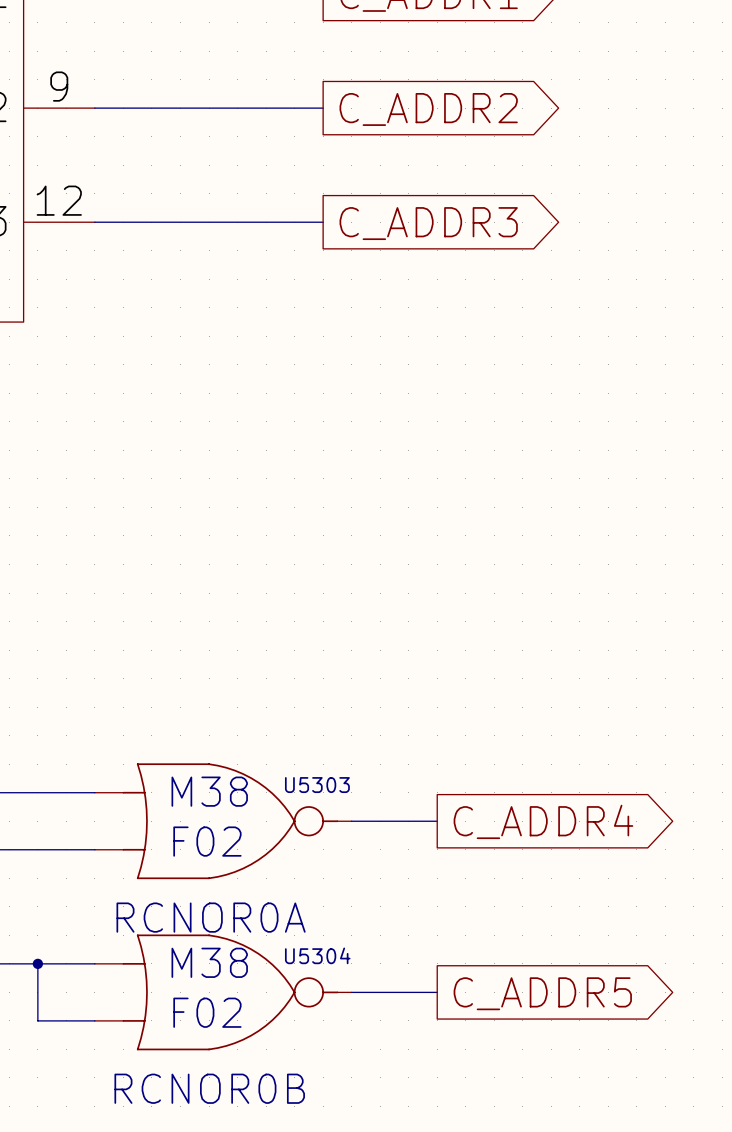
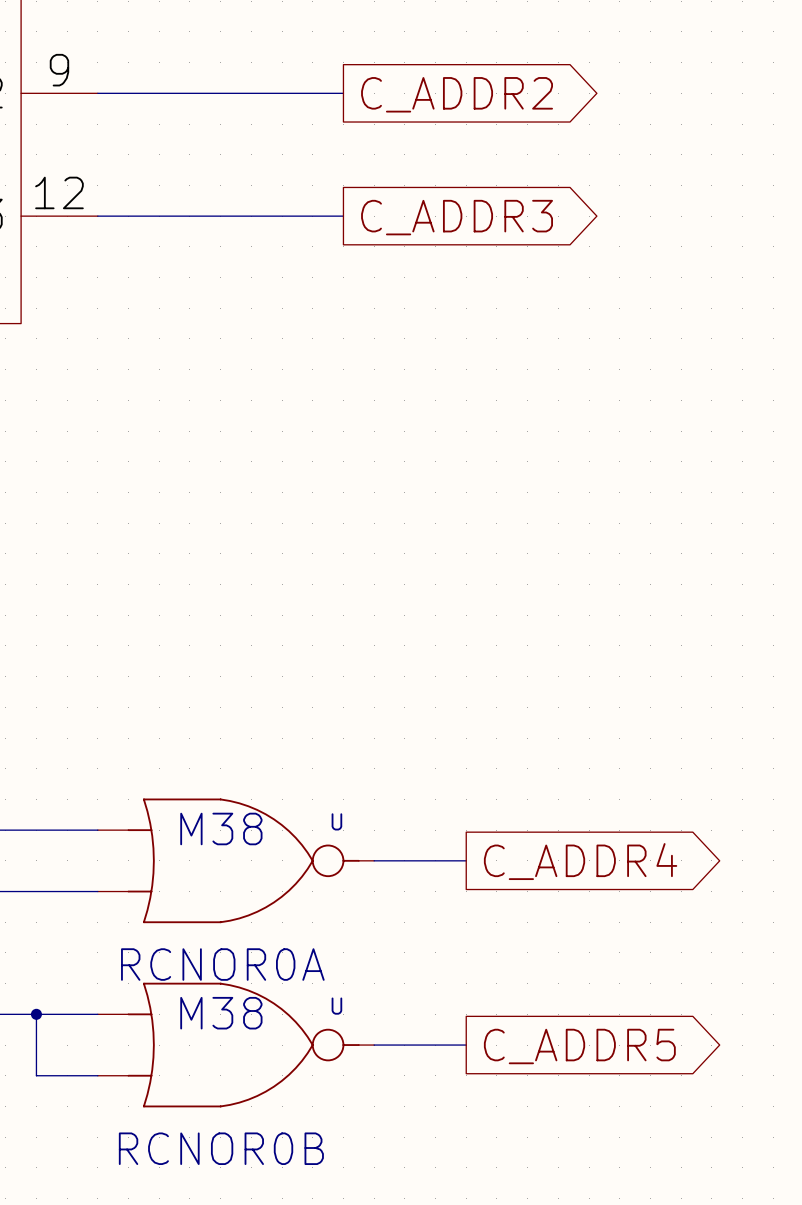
U5303 name: U5303 (317, 785) -> U (336, 821)
U5303 value: F02 (207, 841) -> none
U5304 name: U5304 (317, 955) -> U (336, 1006)
U5304 value: F02 (207, 1012) -> none

